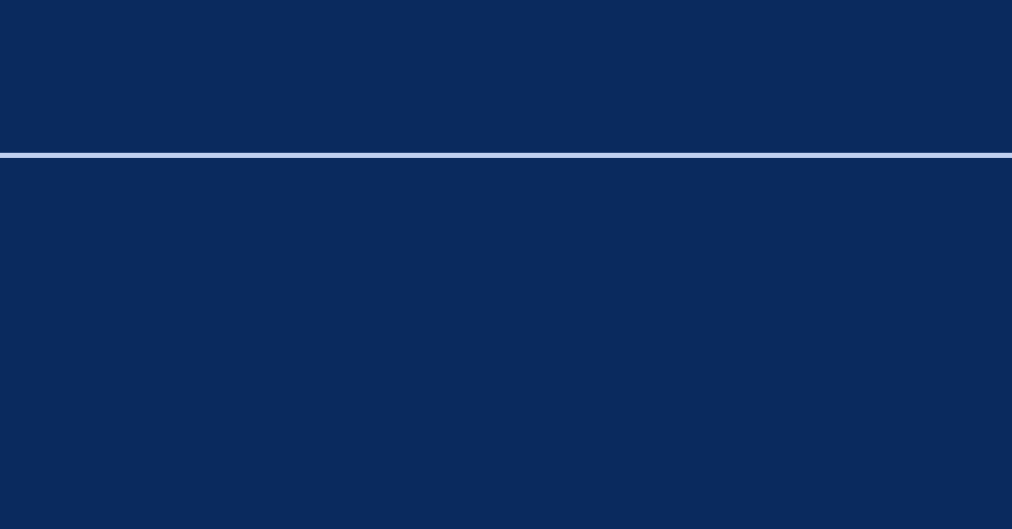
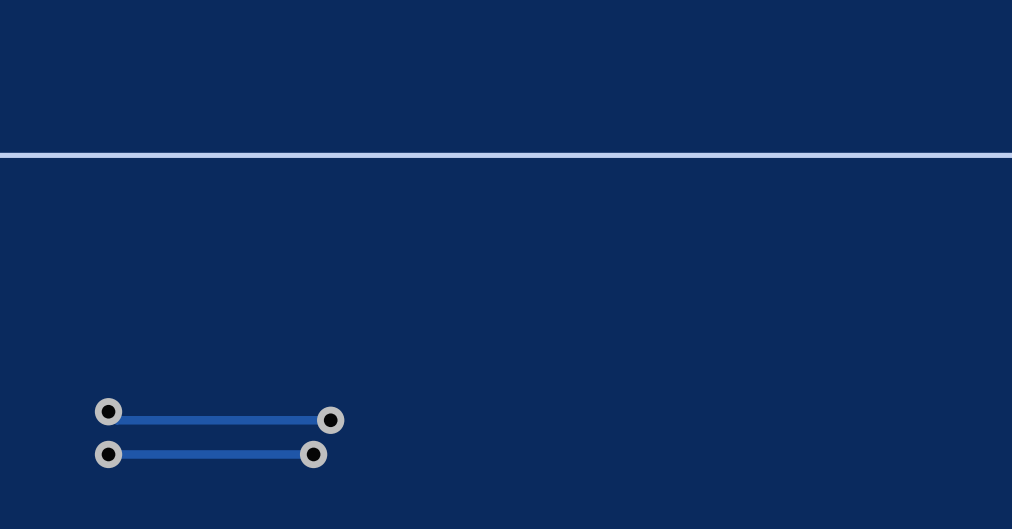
track: none -> (108, 411) (117, 420) (330, 420)
via: none -> (108, 411)
via: none -> (330, 420)
via: none -> (108, 454)
track: none -> (313, 454) (108, 454)
via: none -> (313, 454)

